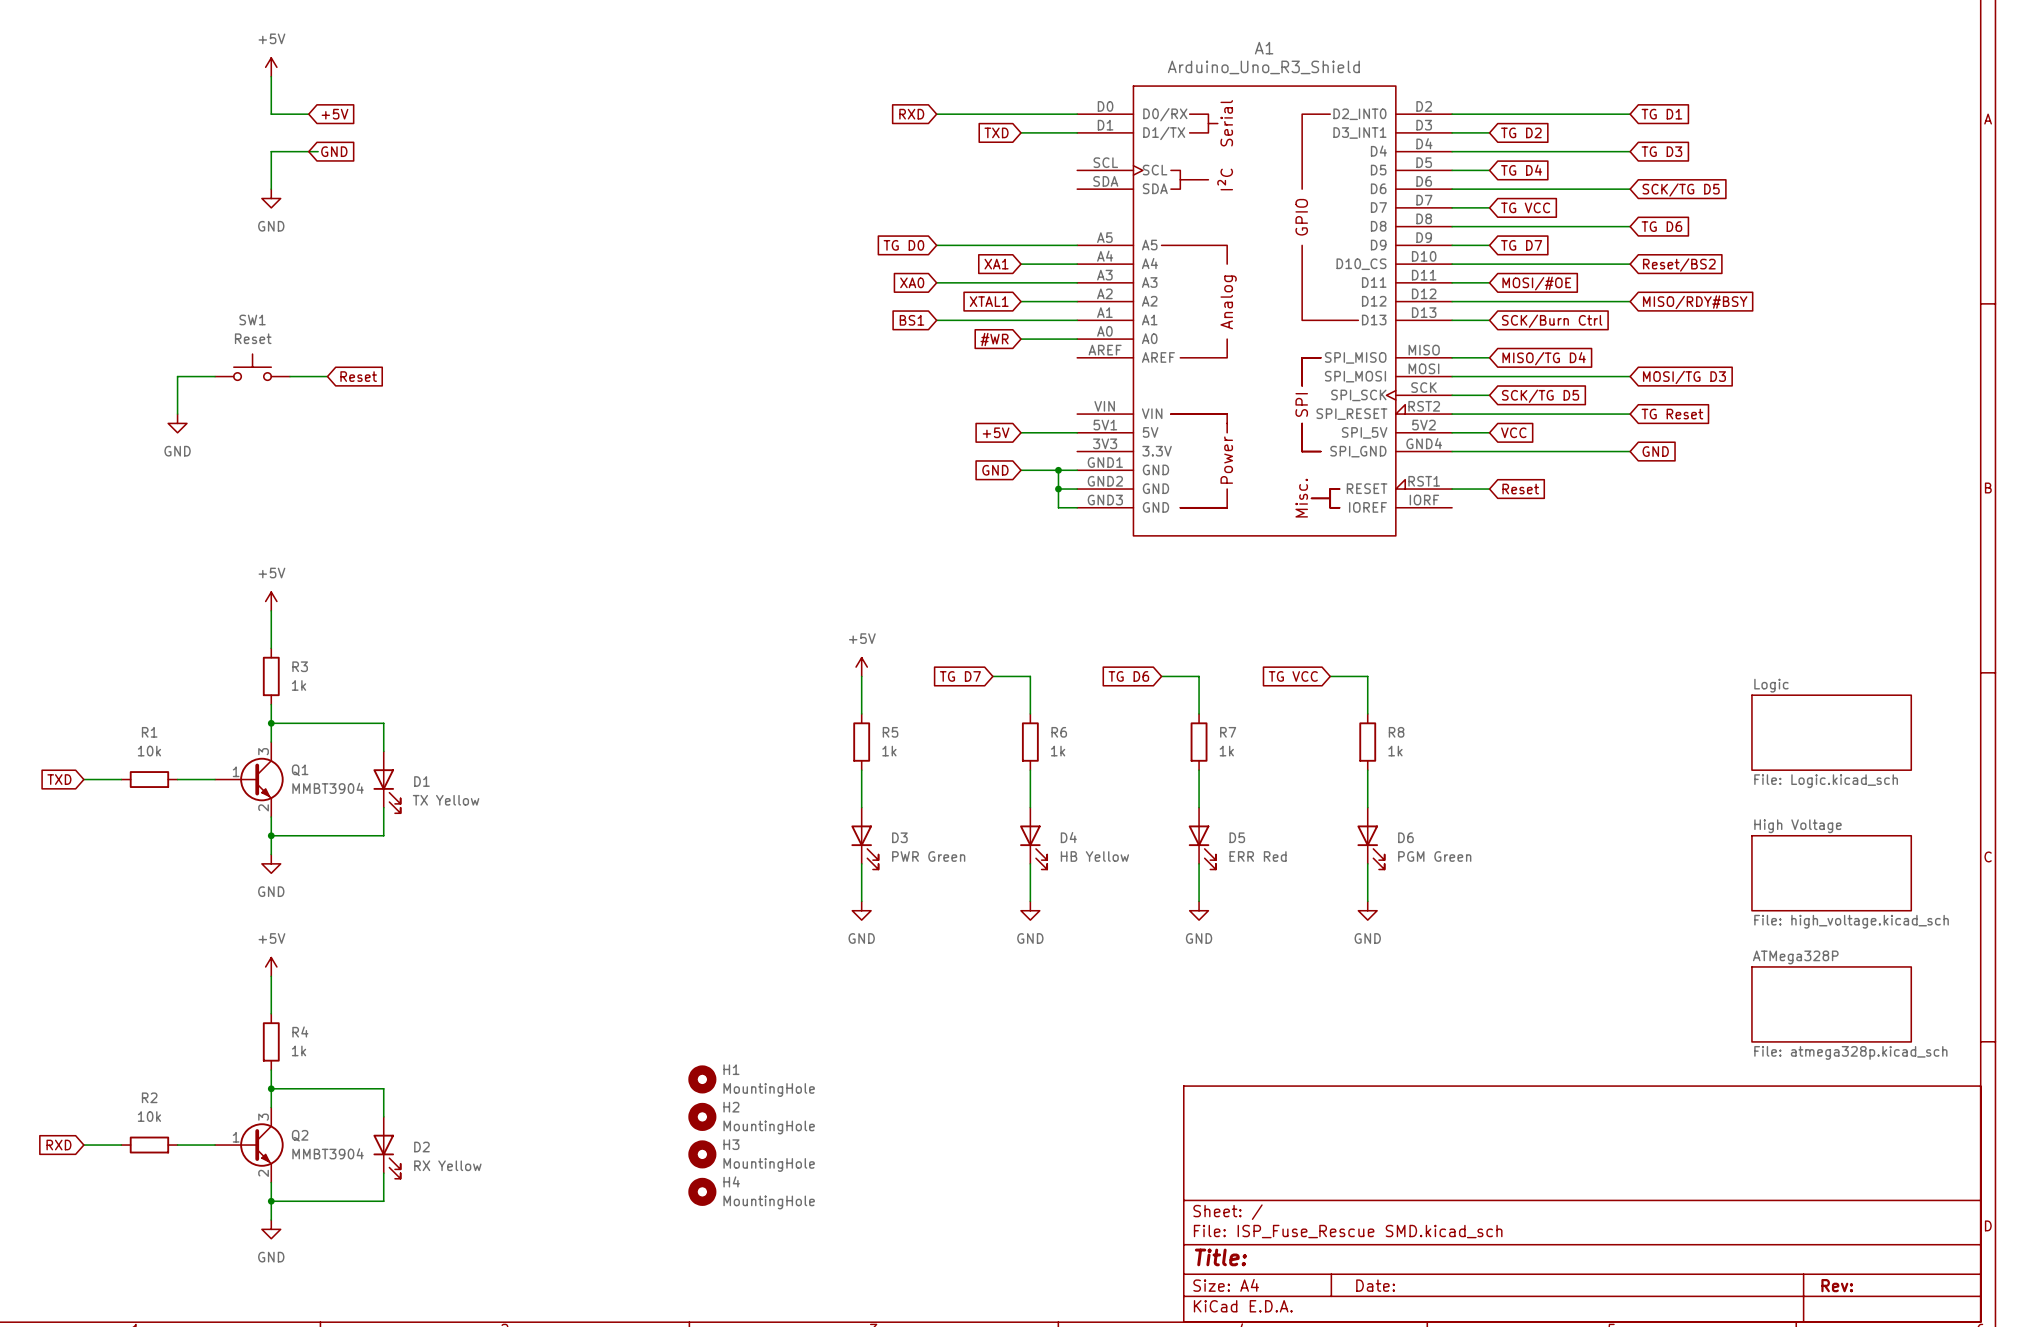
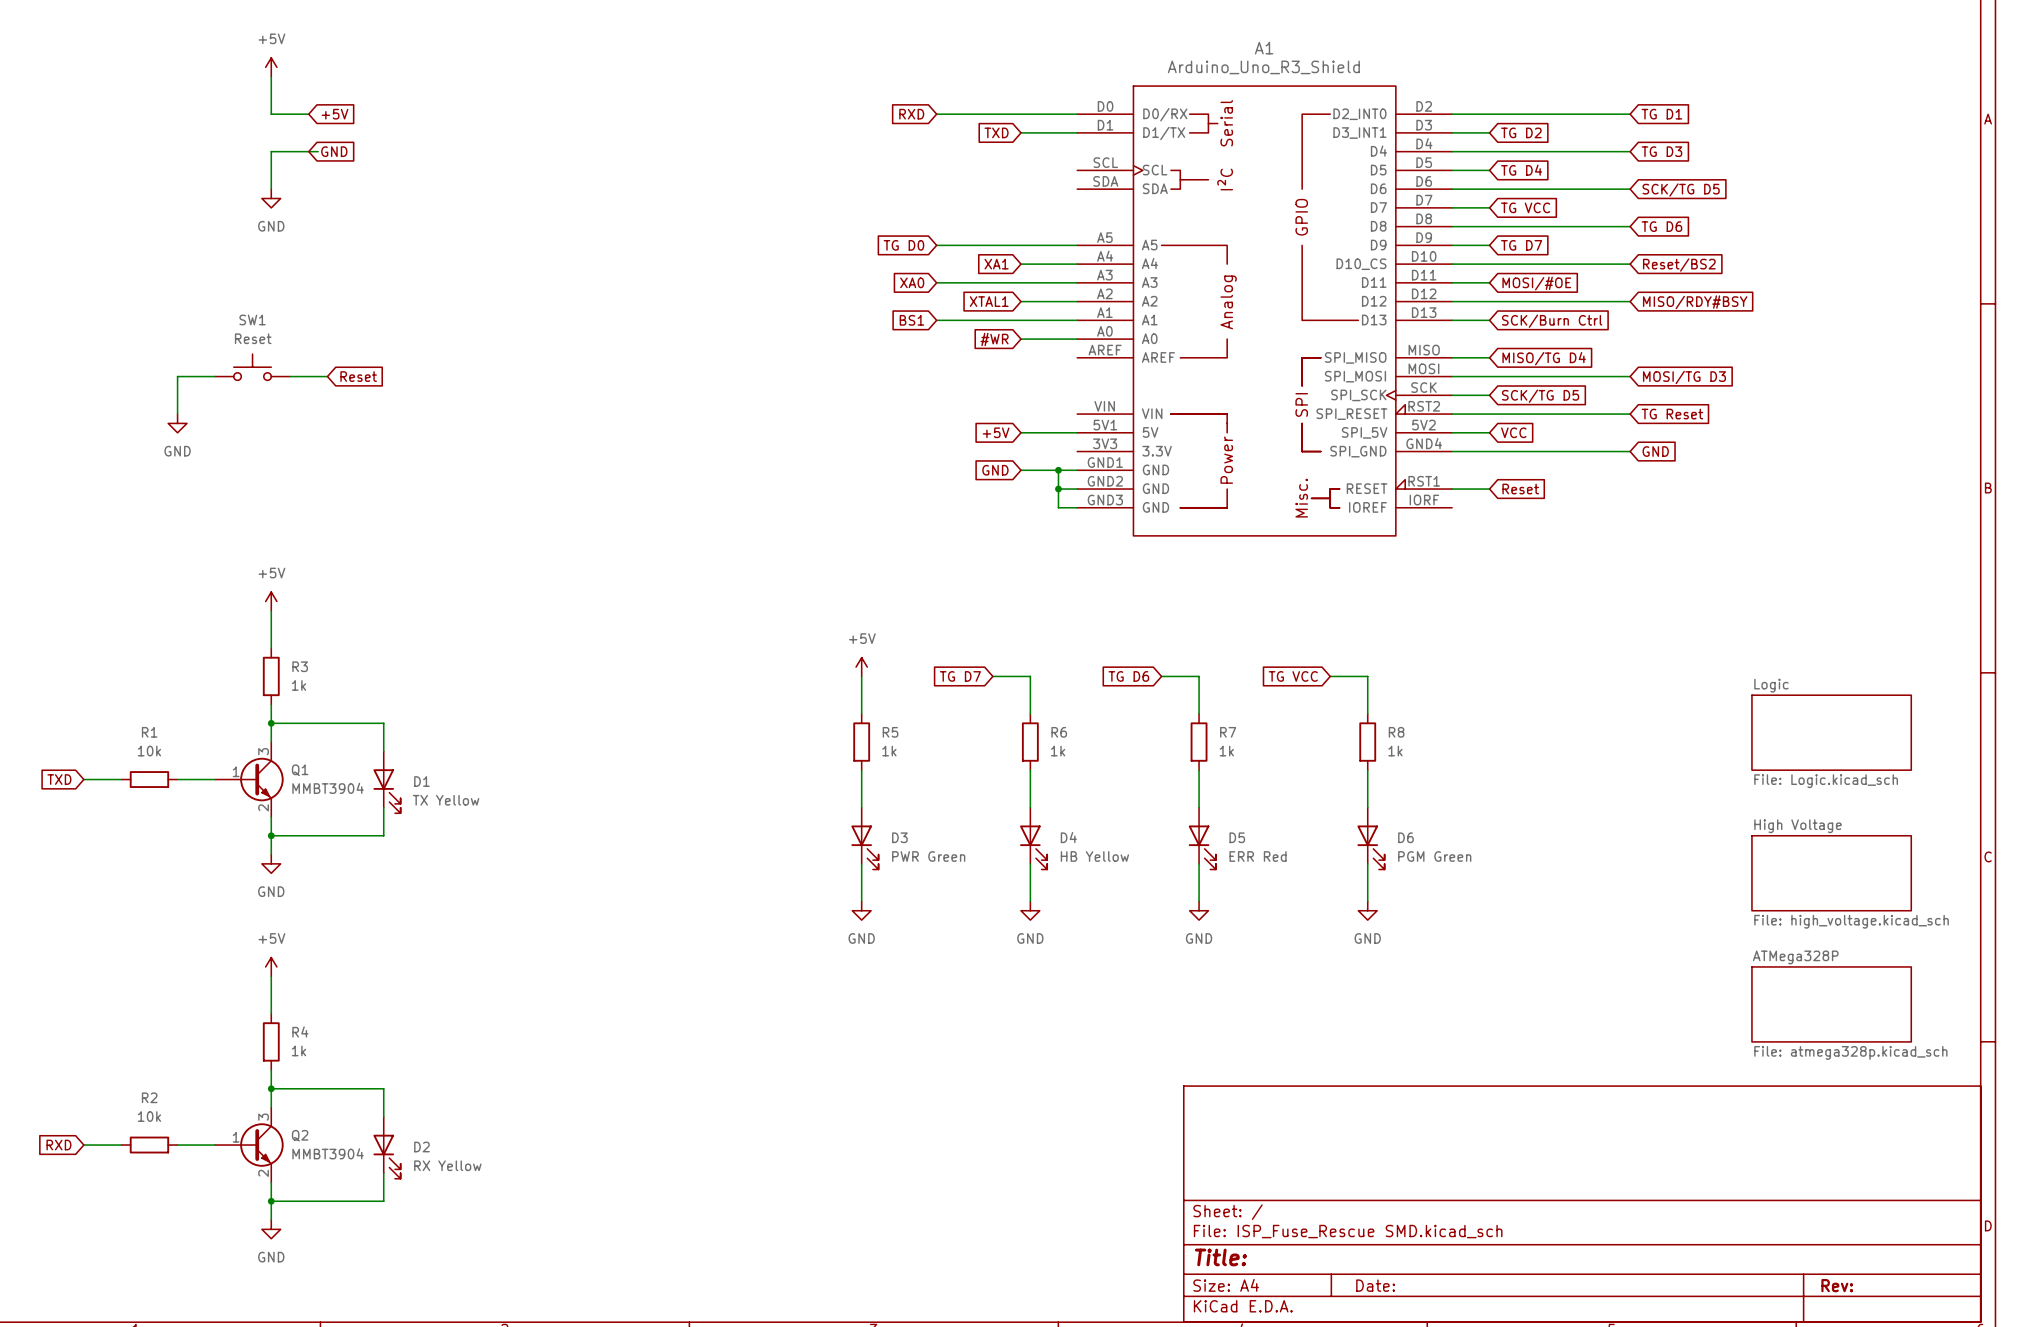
H1: MountingHole (702, 1079) -> none
H2: MountingHole (702, 1116) -> none
H3: MountingHole (702, 1154) -> none
H4: MountingHole (702, 1191) -> none

